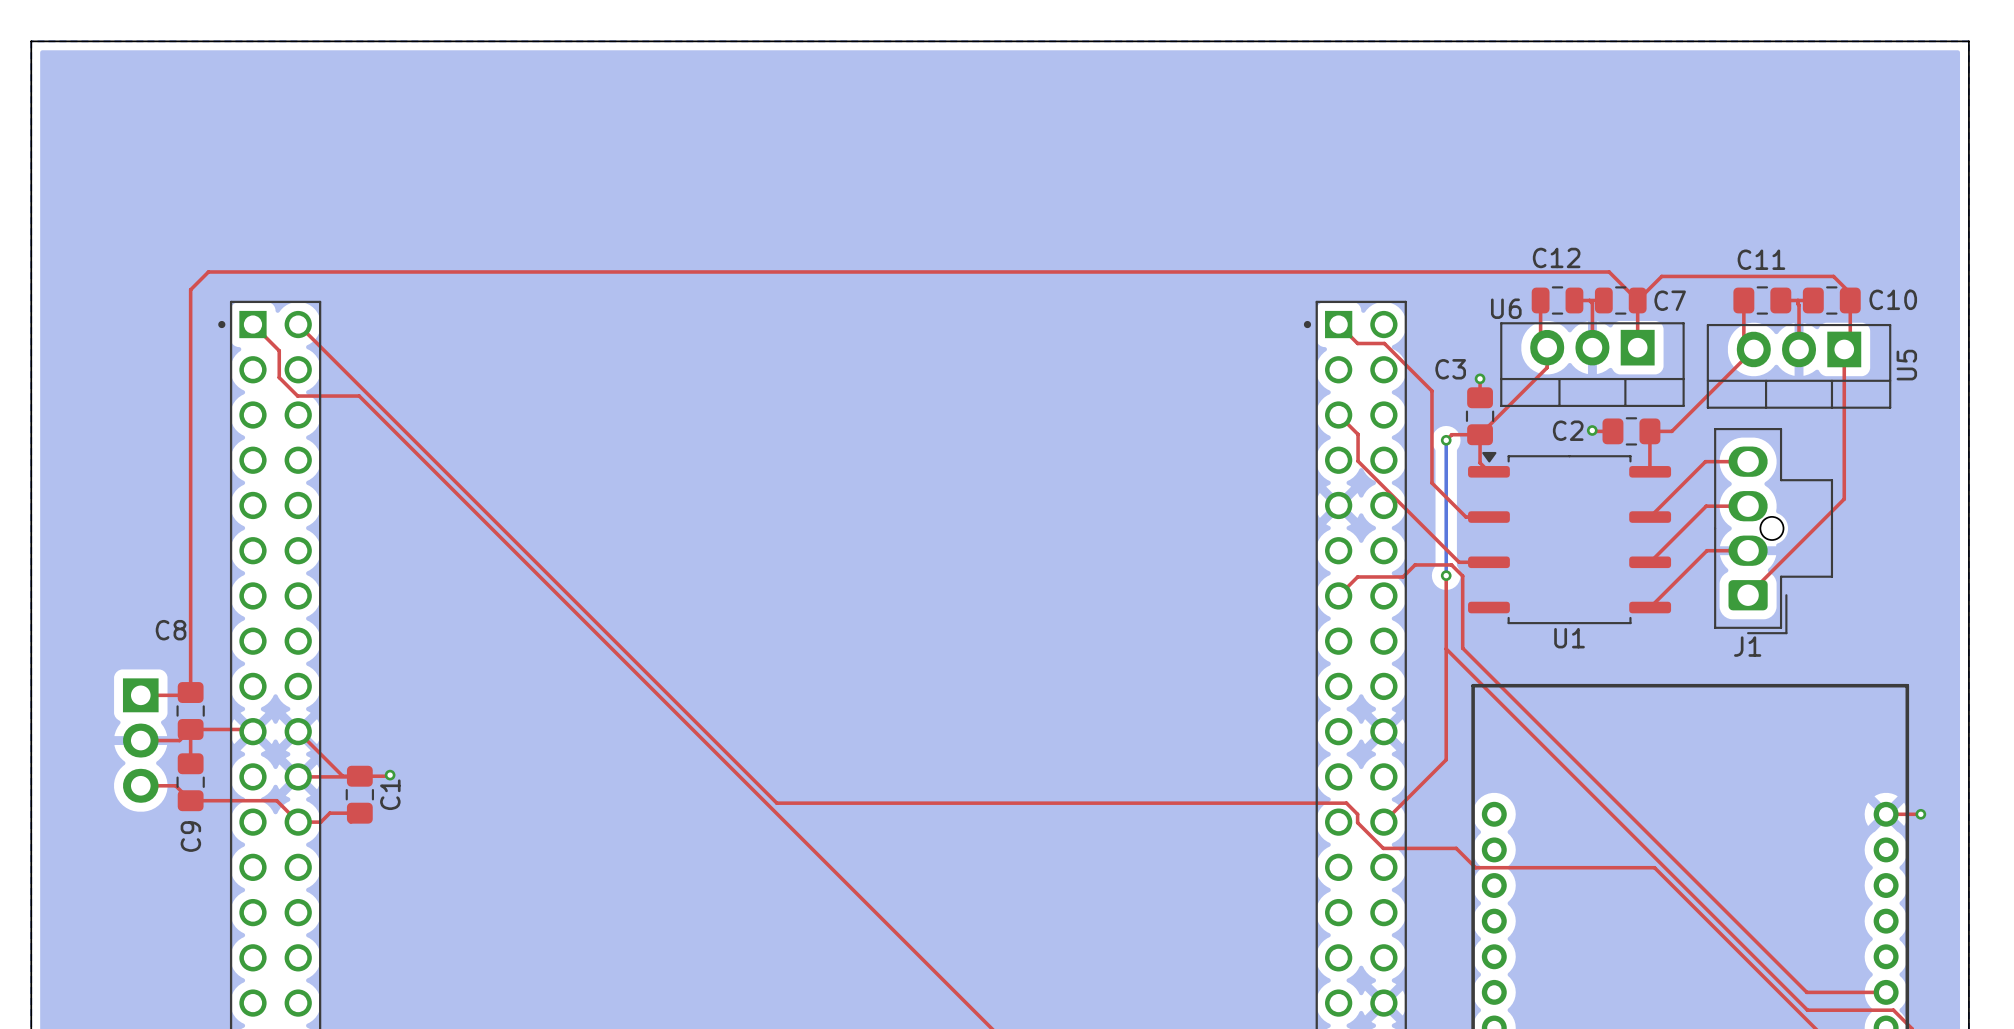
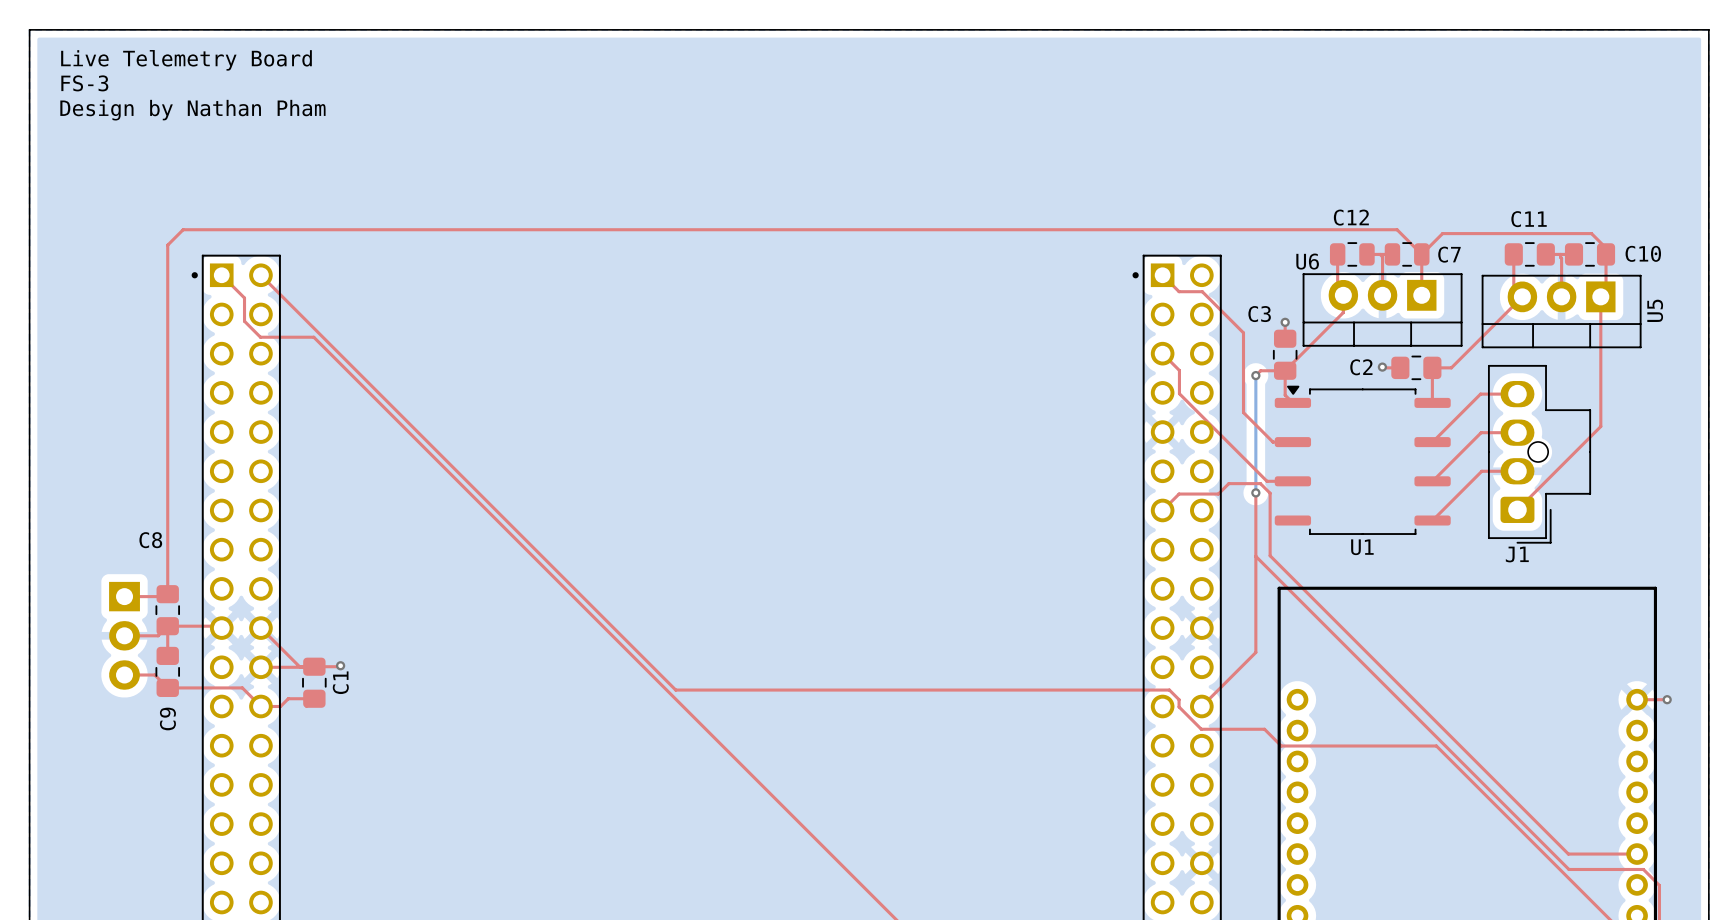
text: none -> Live Telemetry Board (186, 60)
text: none -> FS-3 (84, 83)
text: none -> Design by Nathan Pham (192, 110)

